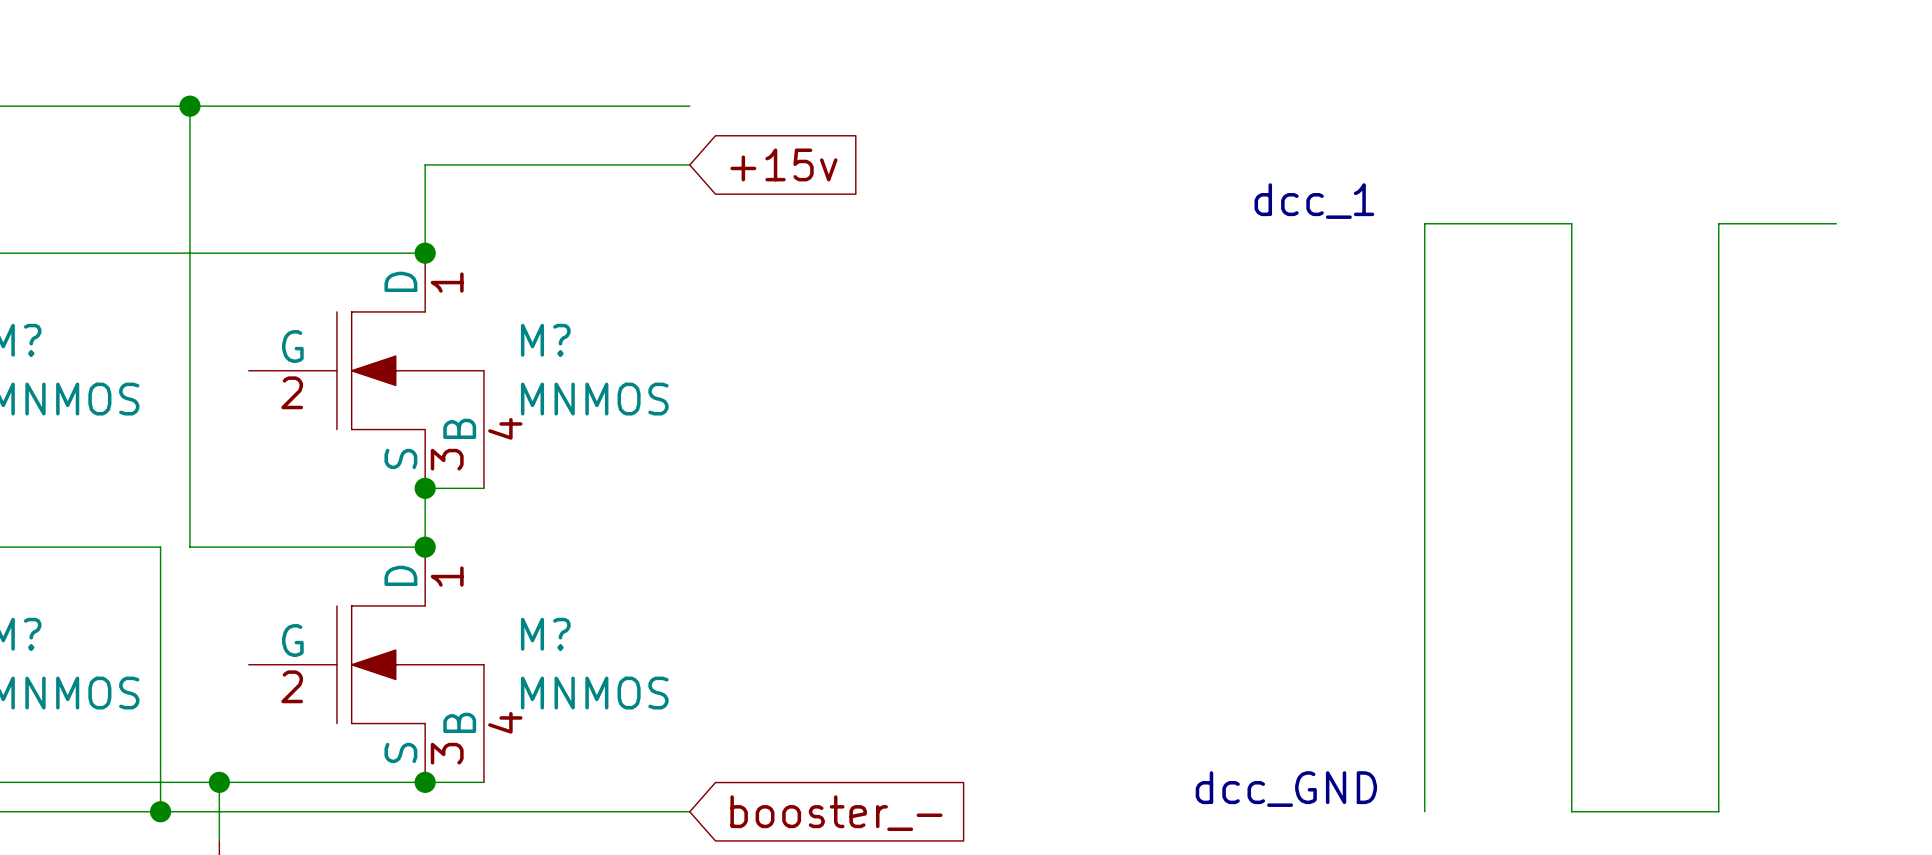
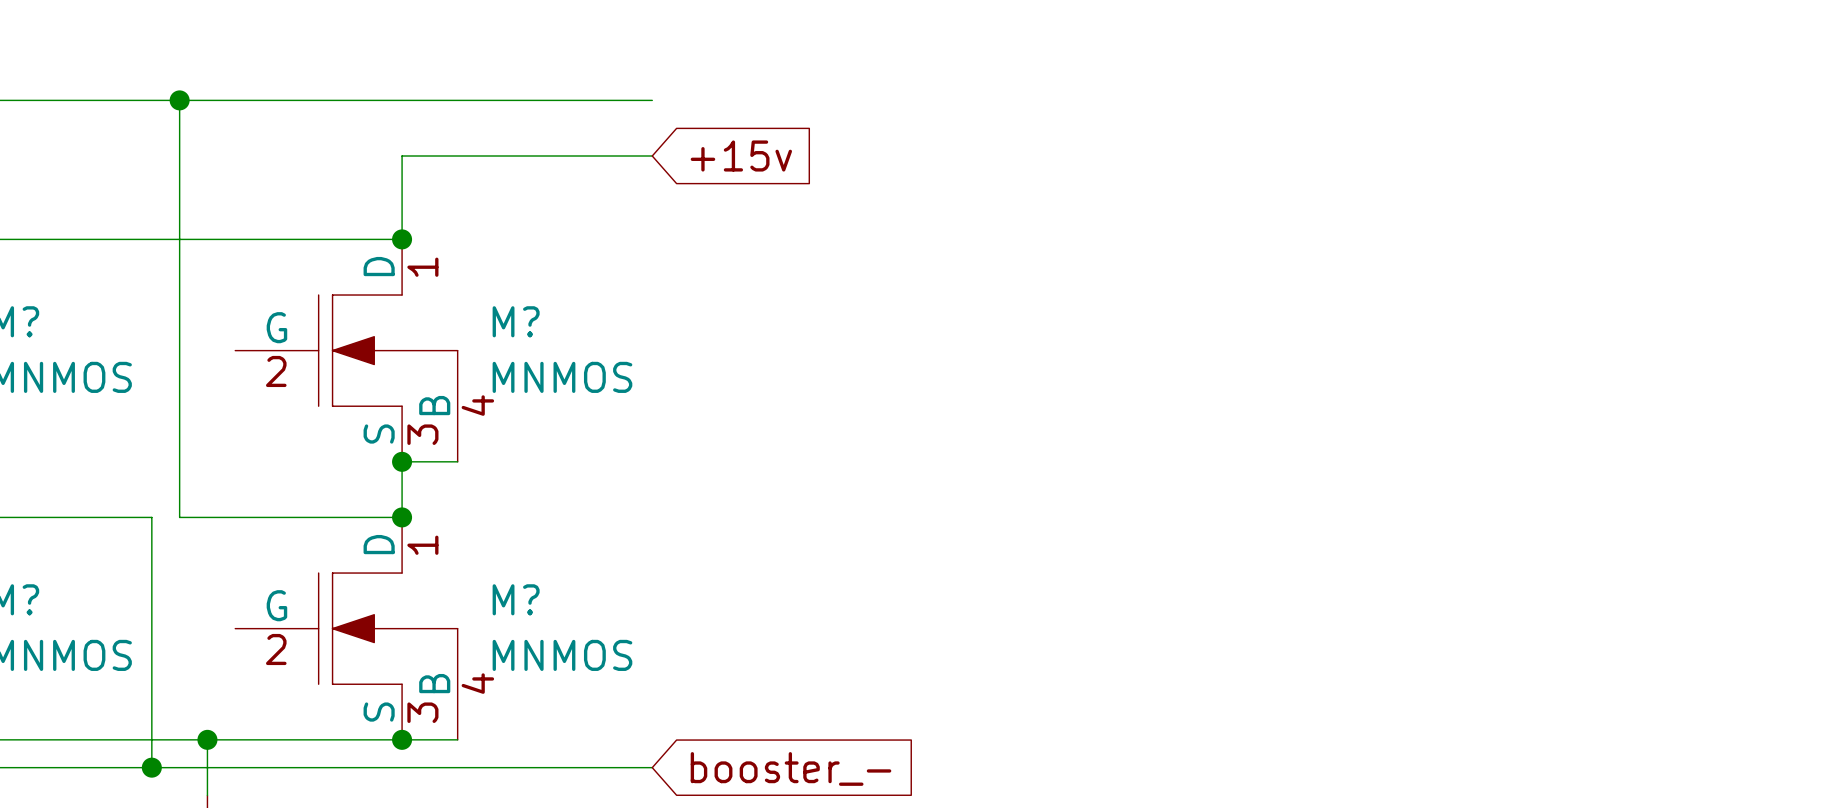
text: dcc_1 (1314, 201) -> none
wire: (1836, 223) (1718, 223) (1718, 811) (1571, 811) (1571, 223) (1424, 223) (1424, 811) -> none
text: dcc_GND (1286, 789) -> none

